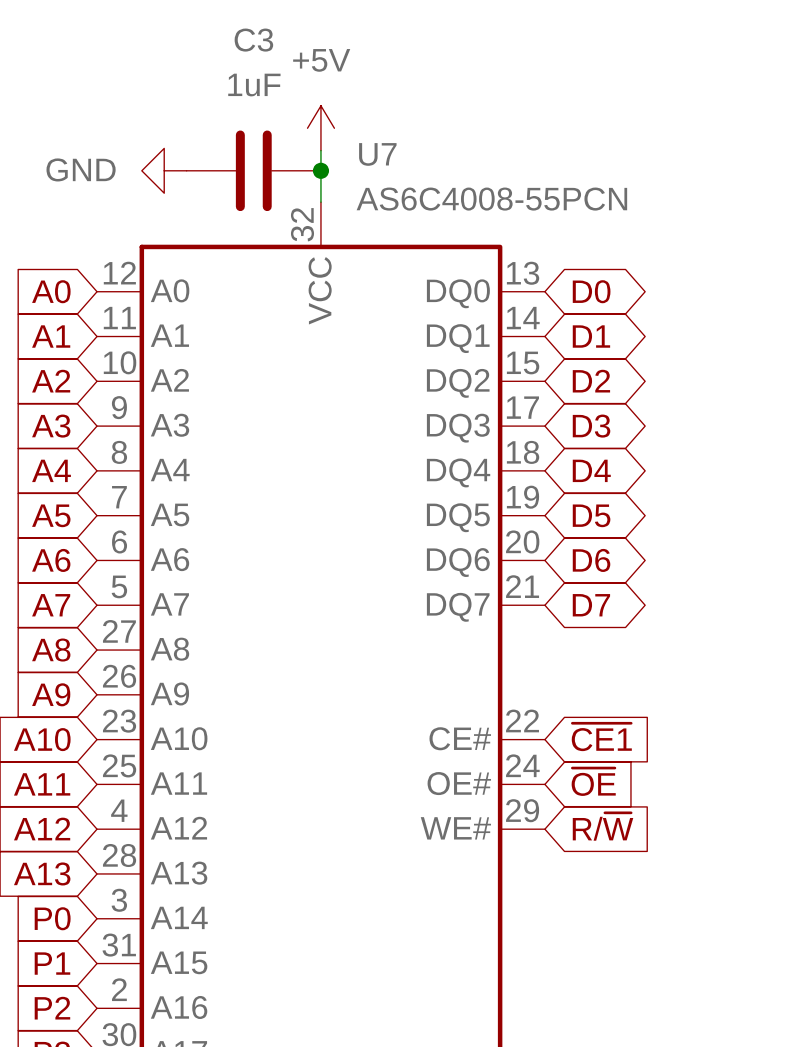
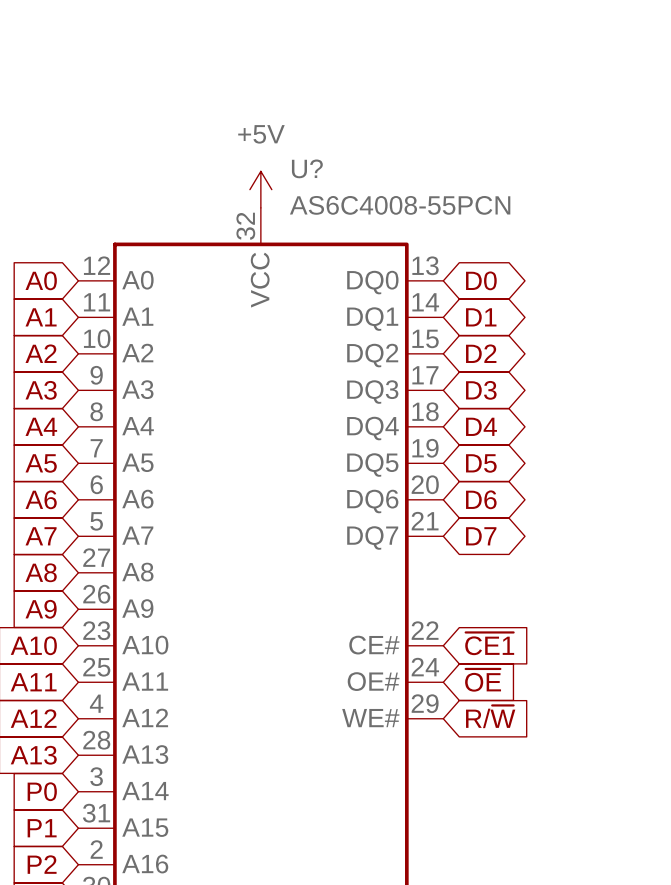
power symbol position: +5V (320, 128) -> +5V (260, 189)
U7 name: U7 (377, 154) -> U? (307, 168)
power symbol: GND (164, 170) -> none
C3: 1uF (253, 170) -> none
junction: (320, 170) -> none

